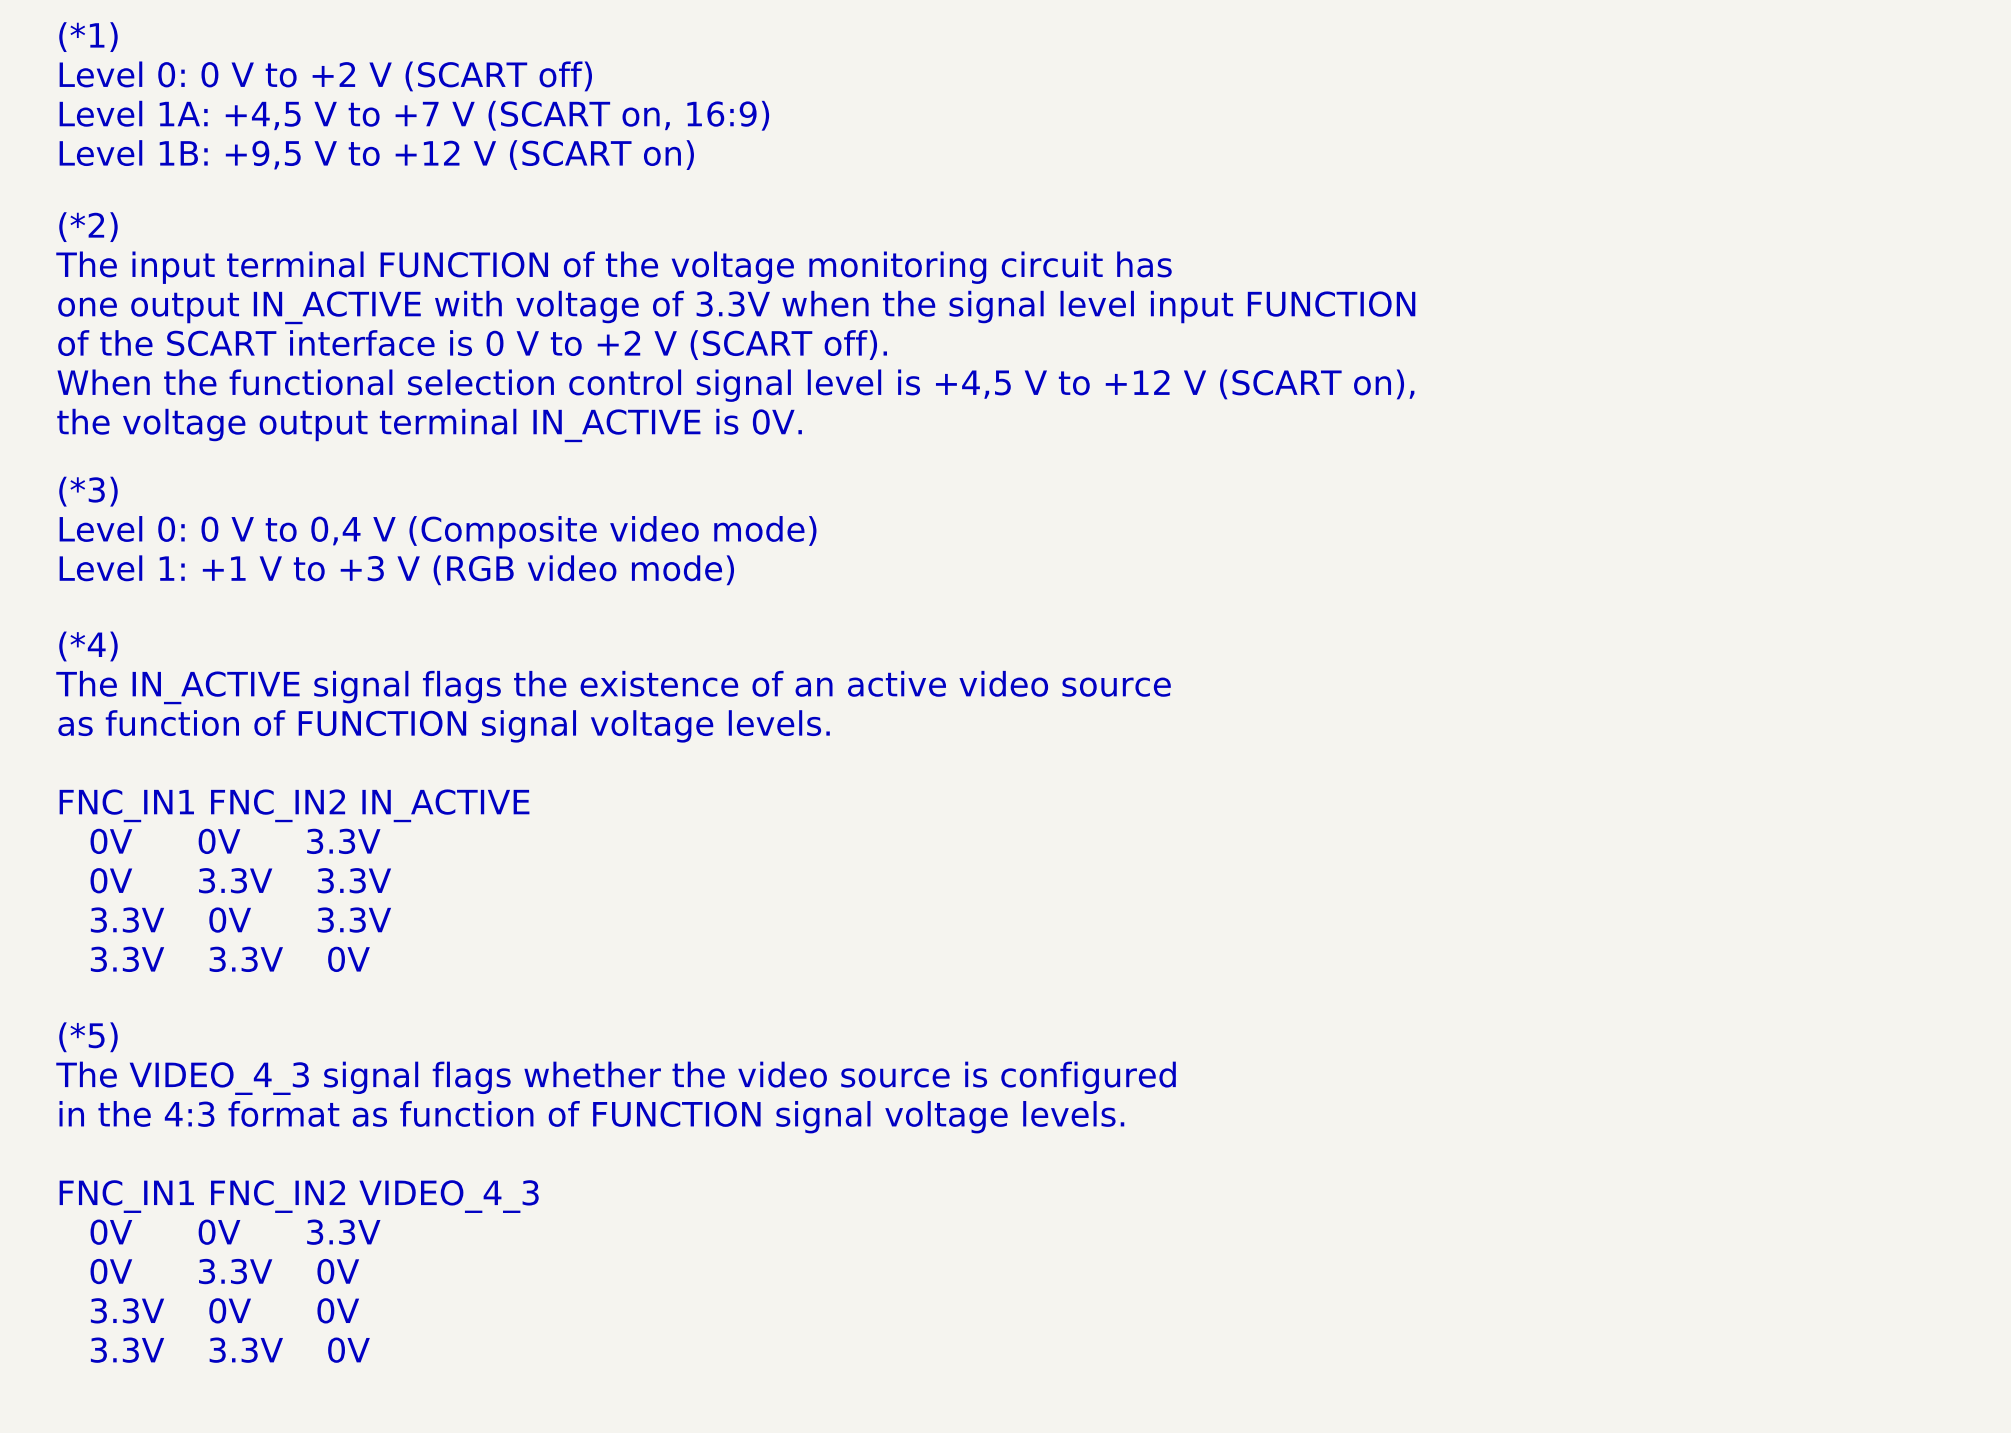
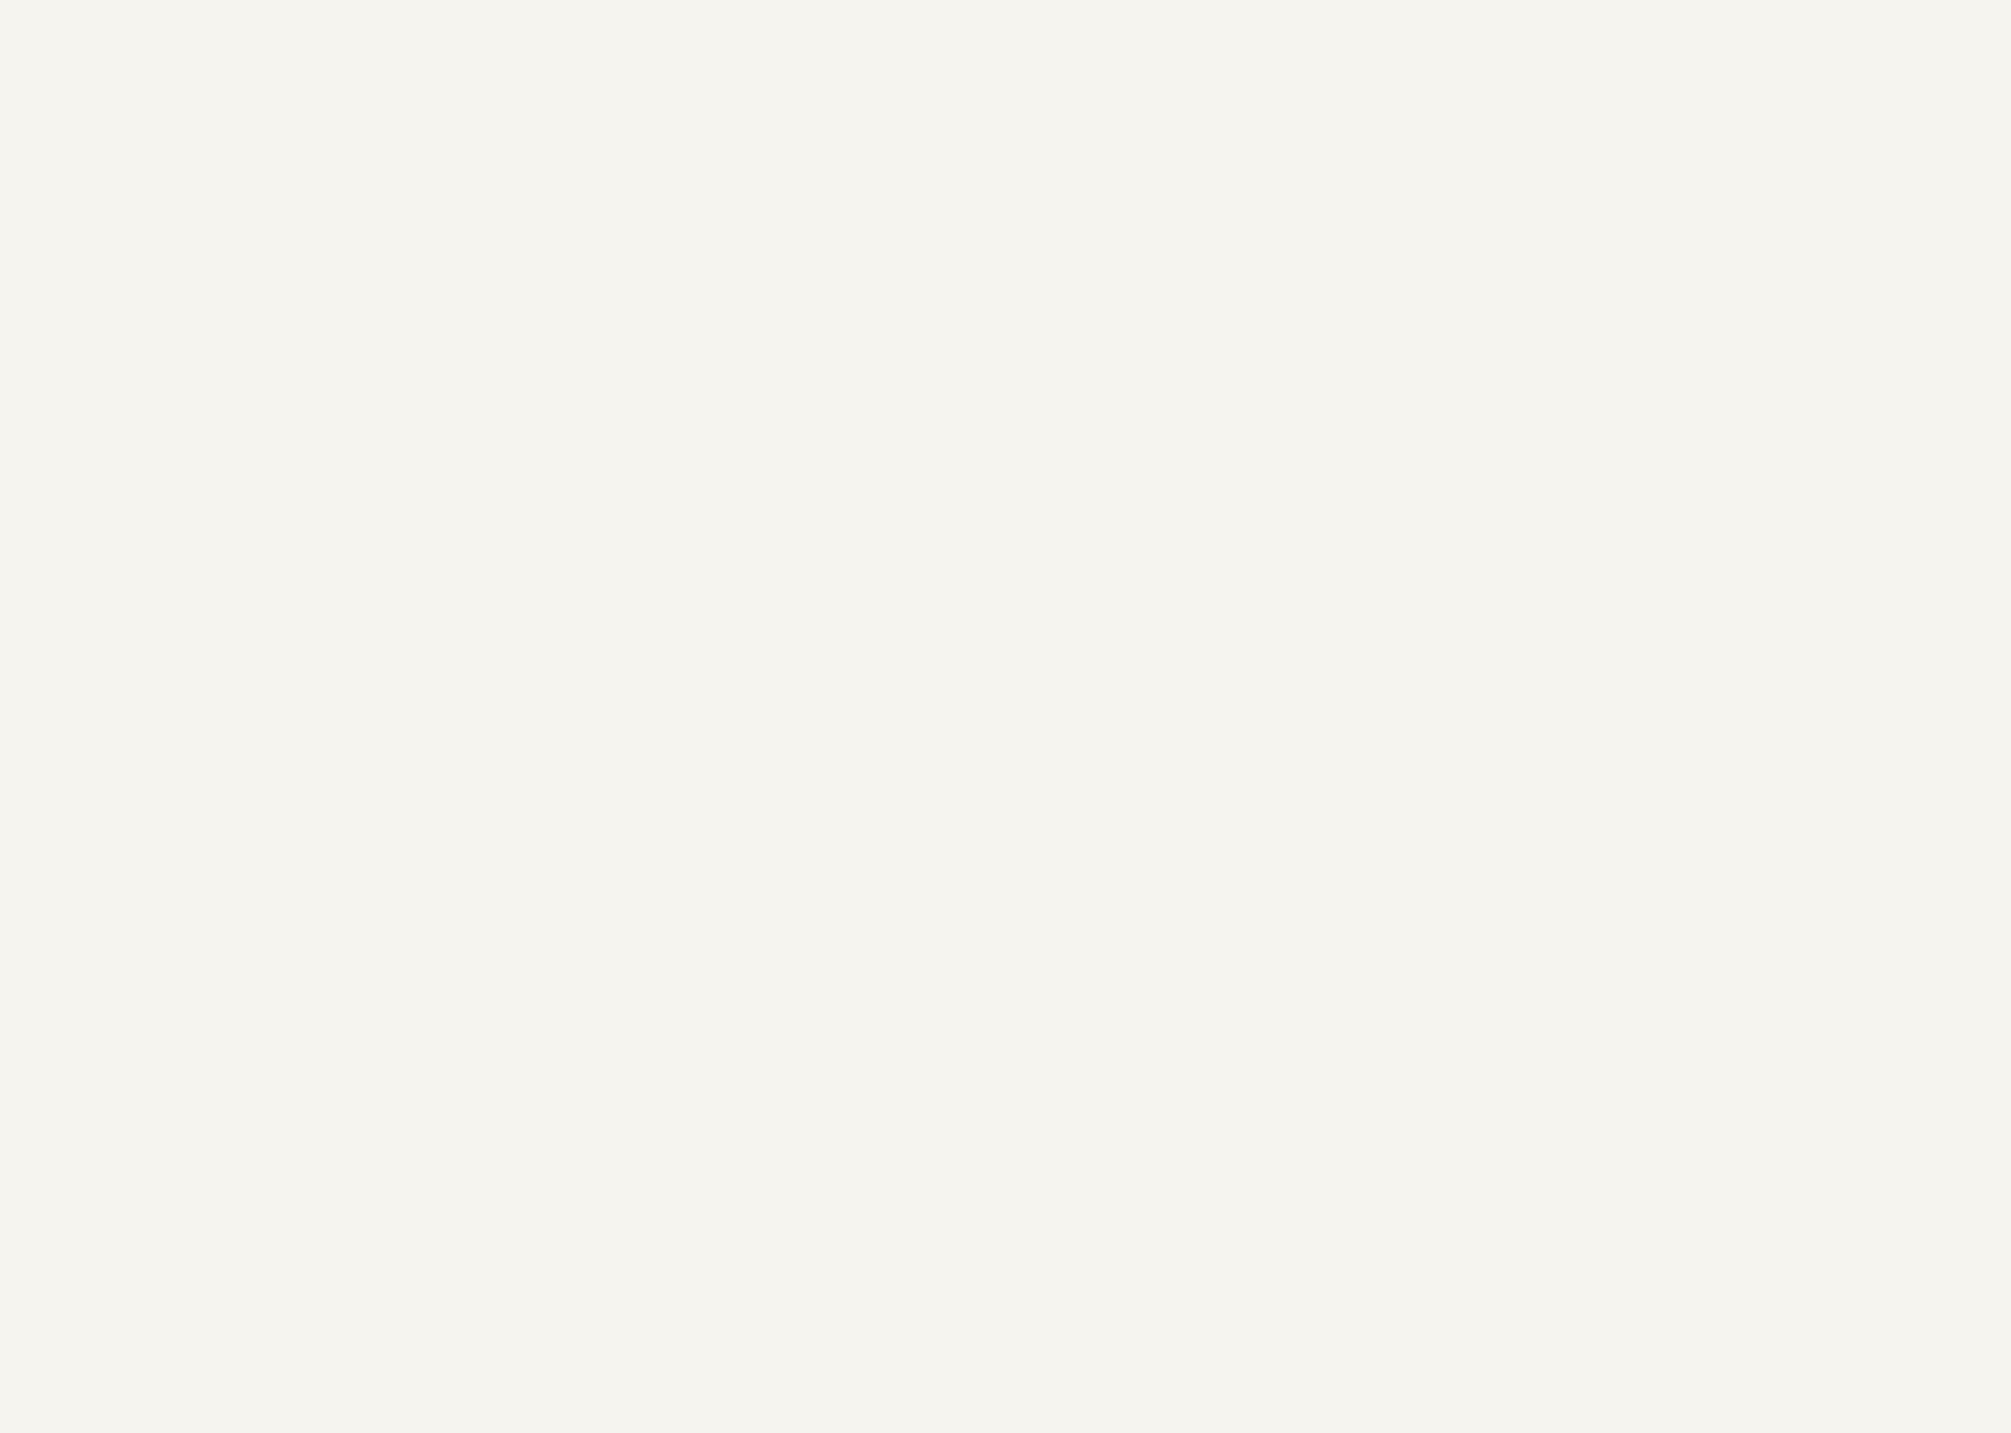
text: (*1) (88, 37) -> none
text: Level 0: 0 V to +2 V (SCART off) (325, 76) -> none
text: Level 1A: +4,5 V to +7 V (SCART on, 16:9) (414, 115) -> none
text: Level 1B: +9,5 V to +12 V (SCART on) (376, 155) -> none
text: (*2) (88, 227) -> none
text: The input terminal FUNCTION of the voltage monitoring circuit has (614, 267) -> none
text: one output IN_ACTIVE with voltage of 3.3V when the signal level input FUNCTION (736, 307) -> none
text: of the SCART interface is 0 V to +2 V (SCART off). (472, 345) -> none
text: When the functional selection control signal level is +4,5 V to +12 V (SCART on), (735, 385) -> none
text: the voltage output terminal IN_ACTIVE is 0V. (429, 425) -> none
text: (*3) (88, 491) -> none
text: Level 0: 0 V to 0,4 V (Composite video mode) (438, 532) -> none
text: Level 1: +1 V to +3 V (RGB video mode) (396, 570) -> none
text: (*4) (88, 646) -> none
text: The IN_ACTIVE signal flags the existence of an active video source (613, 687) -> none
text: as function of FUNCTION signal voltage levels. (444, 726) -> none
text: FNC_IN1 FNC_IN2 IN_ACTIVE (294, 805) -> none
text: 0V 0V 3.3V (235, 841) -> none
text: 0V 3.3V 3.3V (240, 880) -> none
text: 3.3V 0V 3.3V (241, 920) -> none
text: 3.3V 3.3V 0V (230, 959) -> none
text: (*5) (88, 1037) -> none
text: The VIDEO_4_3 signal flags whether the video source is configured (616, 1078) -> none
text: in the 4:3 format as function of FUNCTION signal voltage levels. (591, 1117) -> none
text: FNC_IN1 FNC_IN2 VIDEO_4_3 (299, 1196) -> none
text: 0V 0V 3.3V (235, 1232) -> none
text: 0V 3.3V 0V (224, 1271) -> none
text: 3.3V 0V 0V (225, 1310) -> none
text: 3.3V 3.3V 0V (230, 1350) -> none

